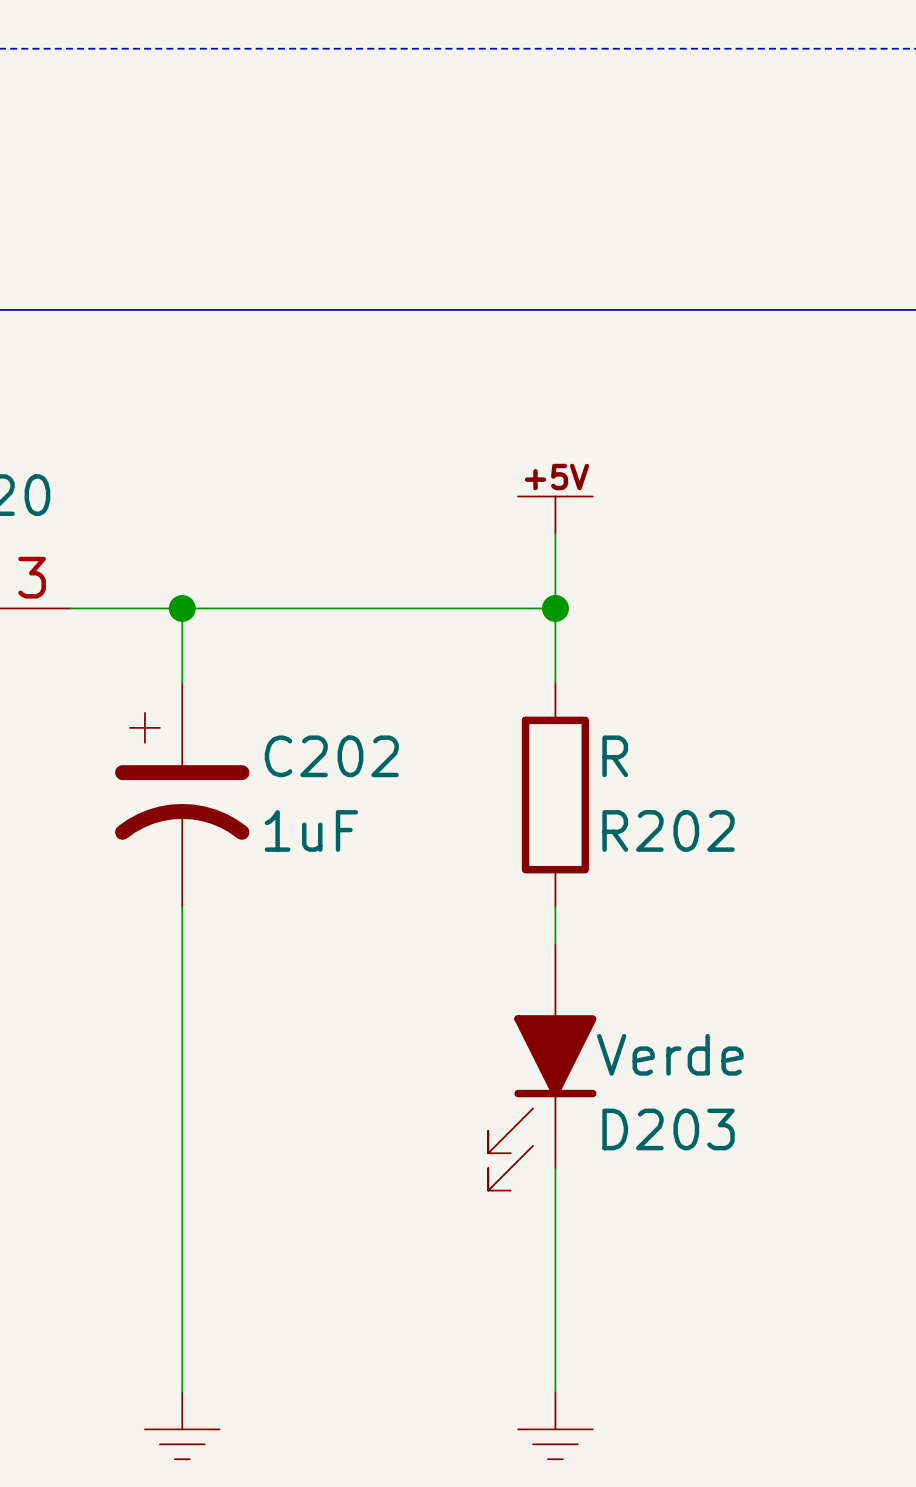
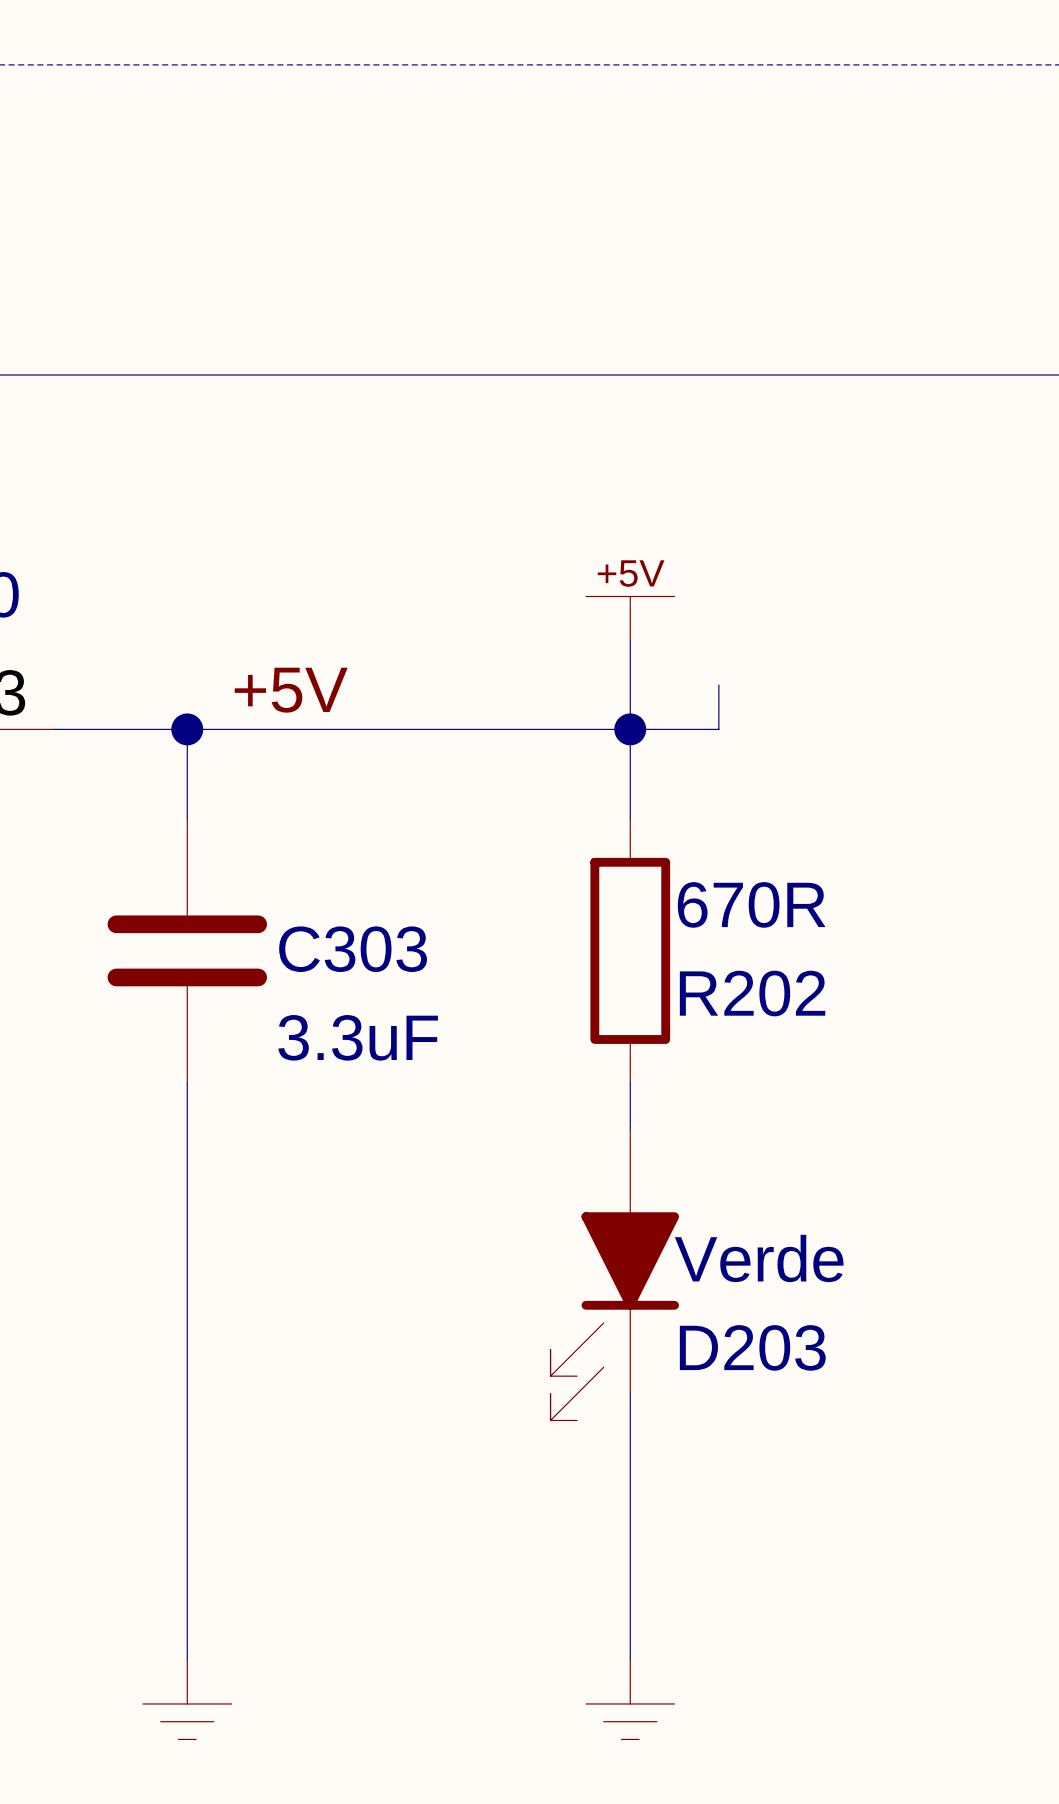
wire: none -> (718, 685) (718, 729) (630, 729)
label: none -> +5V (291, 690)
R202 value: R (615, 756) -> 670R (751, 904)
C202: 1uF (182, 795) -> none
C303: none -> 3.3uF (187, 950)

